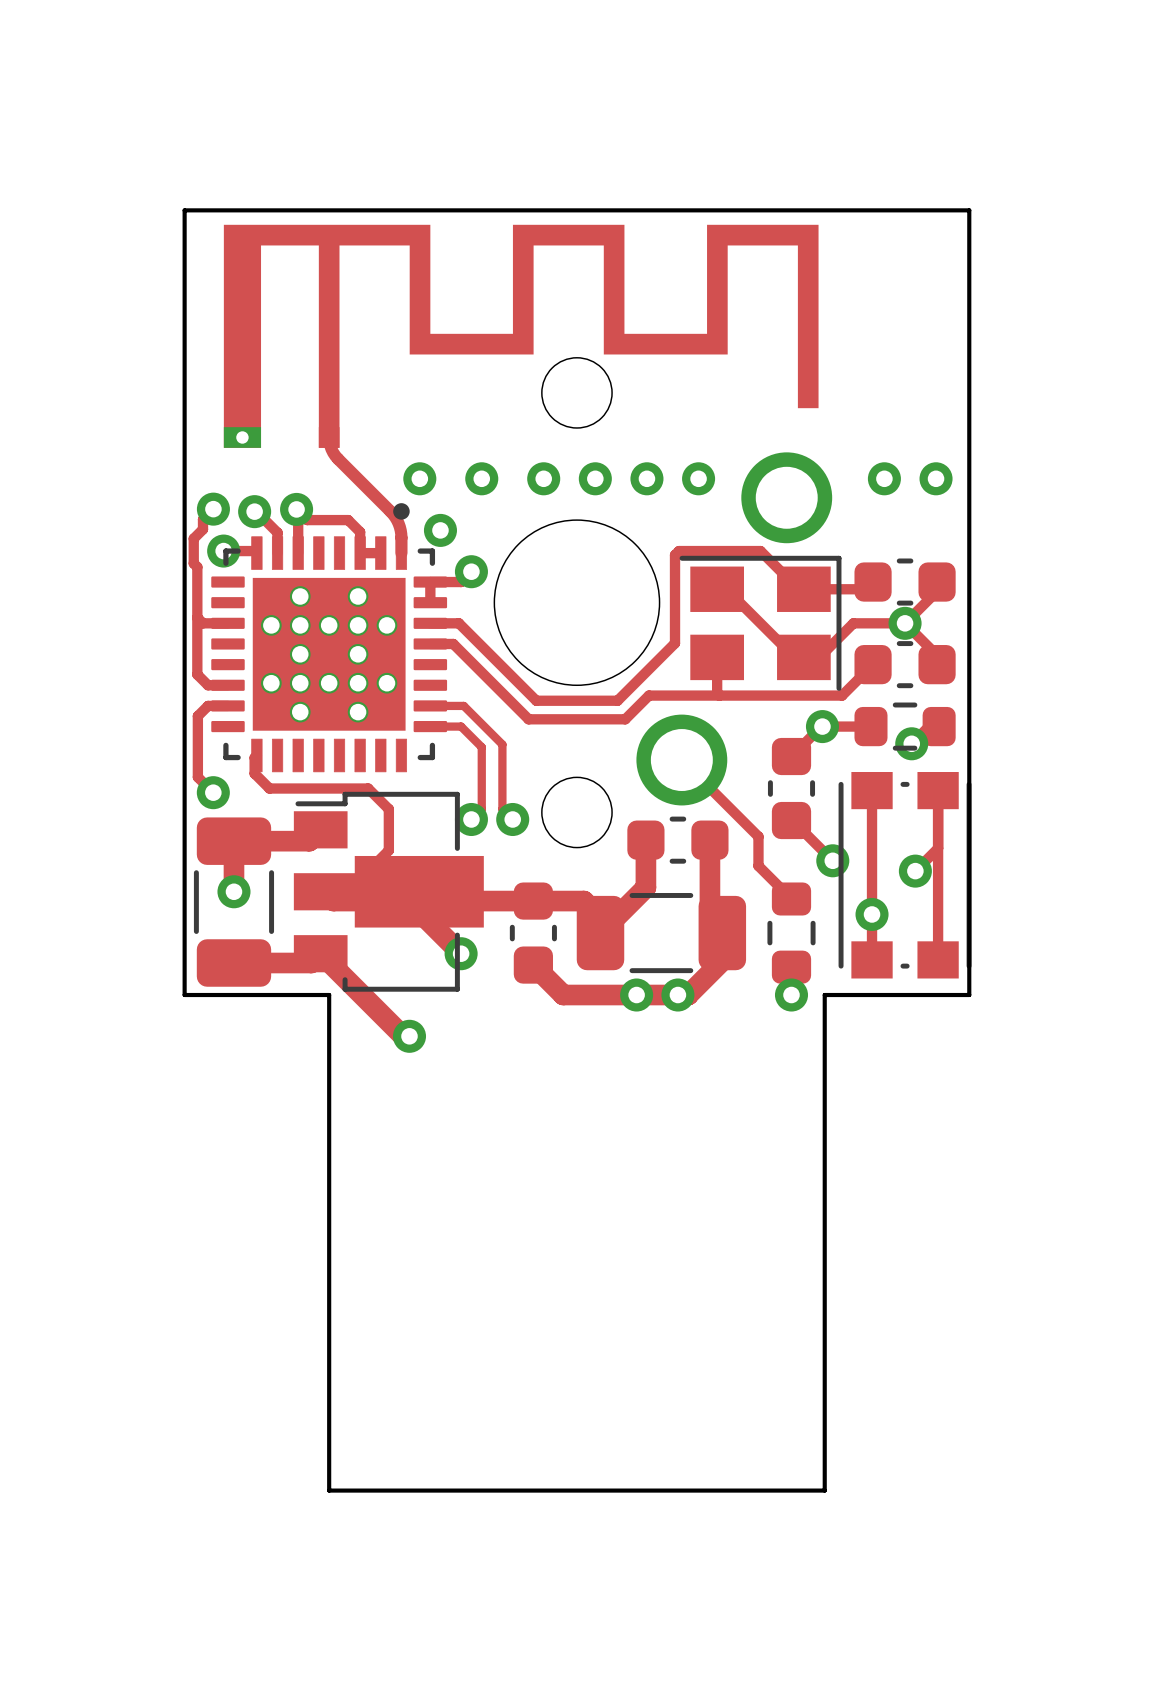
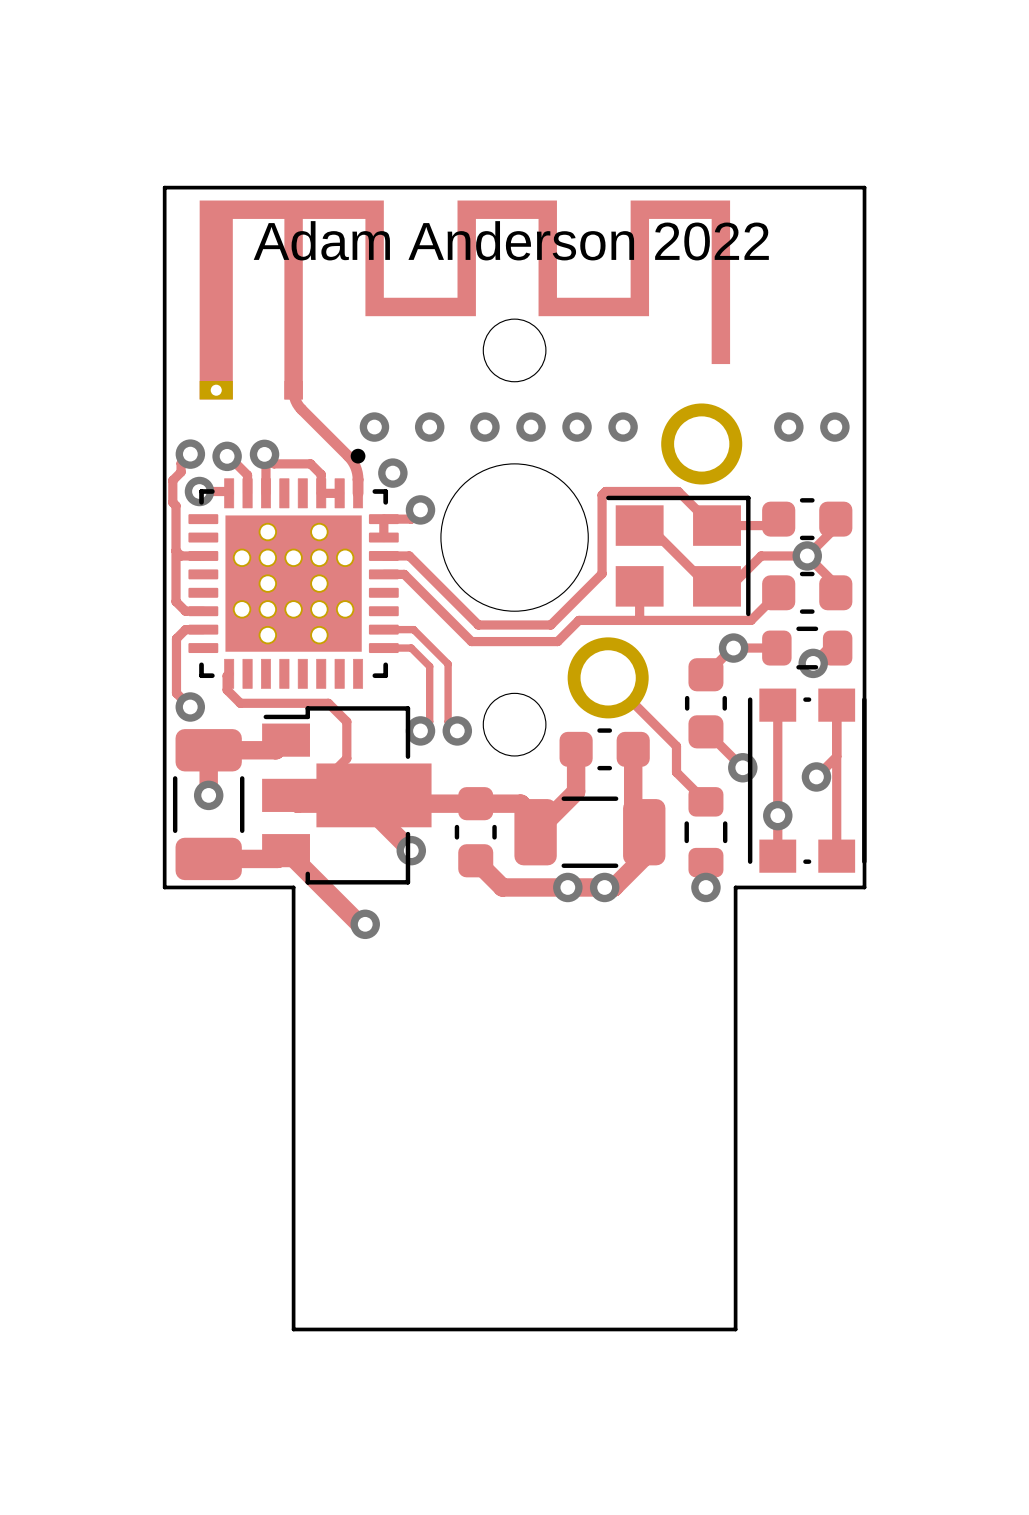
text: none -> Adam Anderson 2022 (511, 240)

